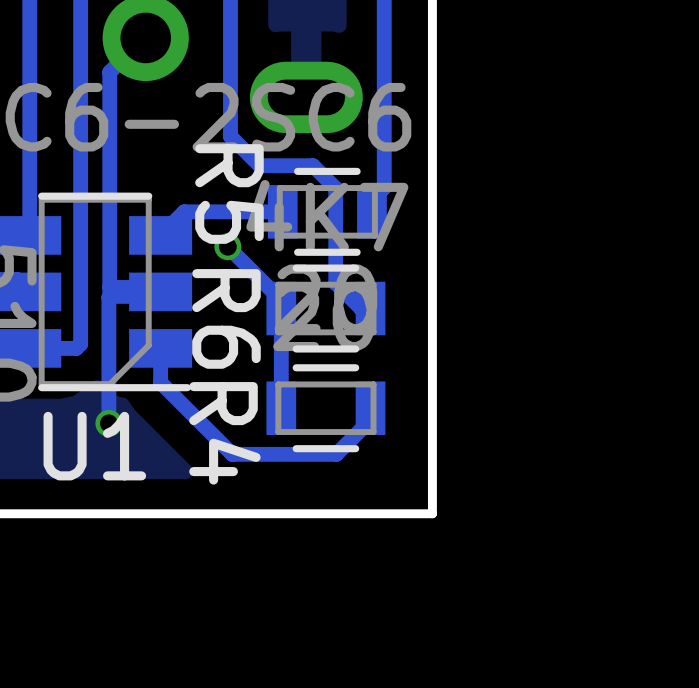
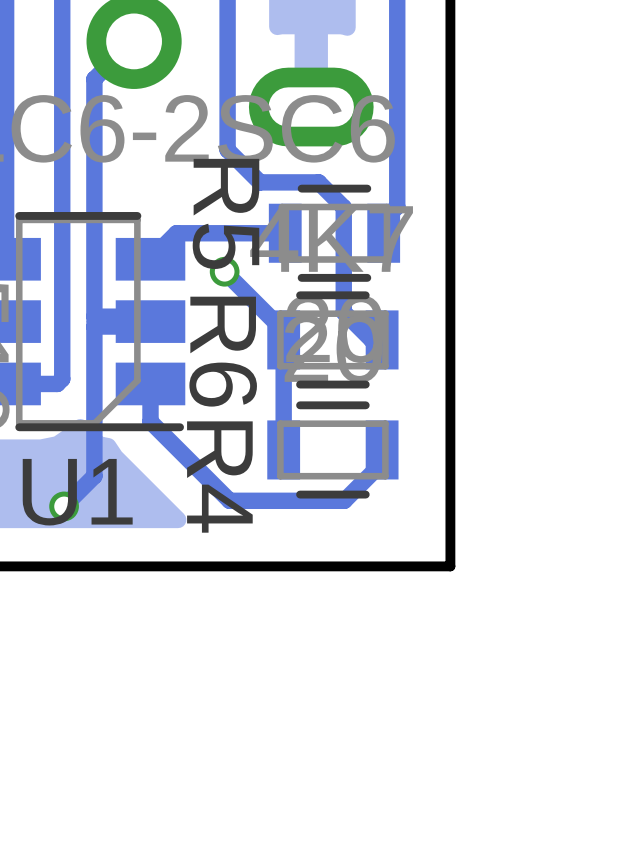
track: (109, 296) (108, 423) -> (94, 326) (94, 476) (64, 506)
via position: (108, 423) -> (64, 506)

